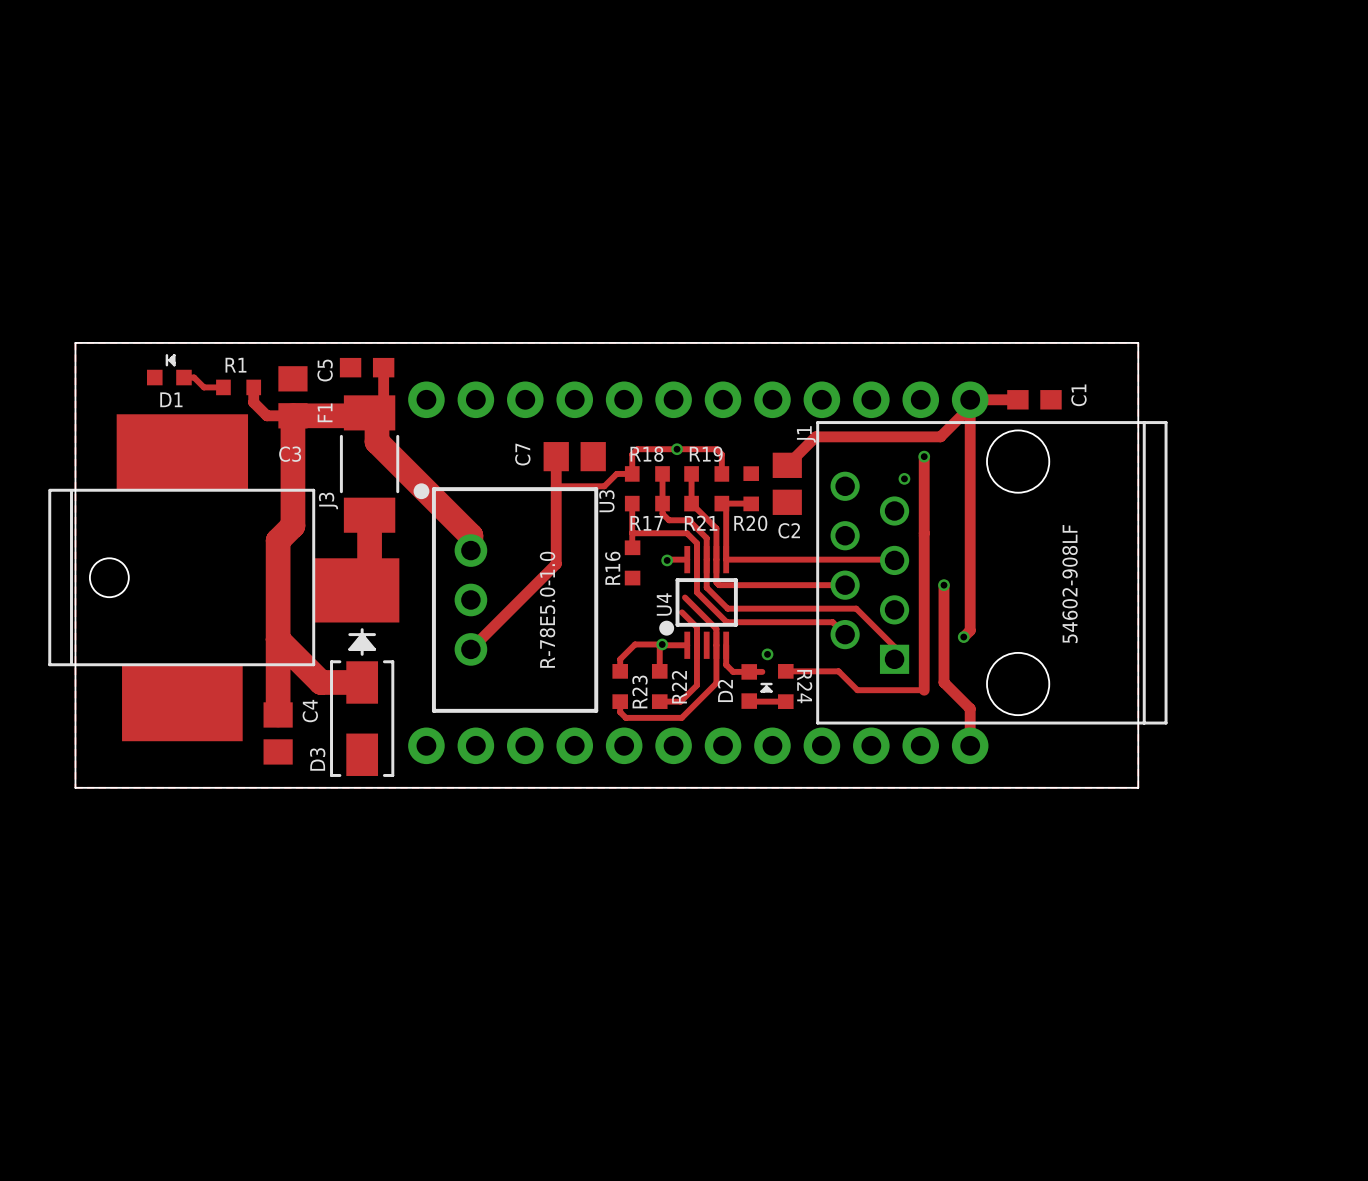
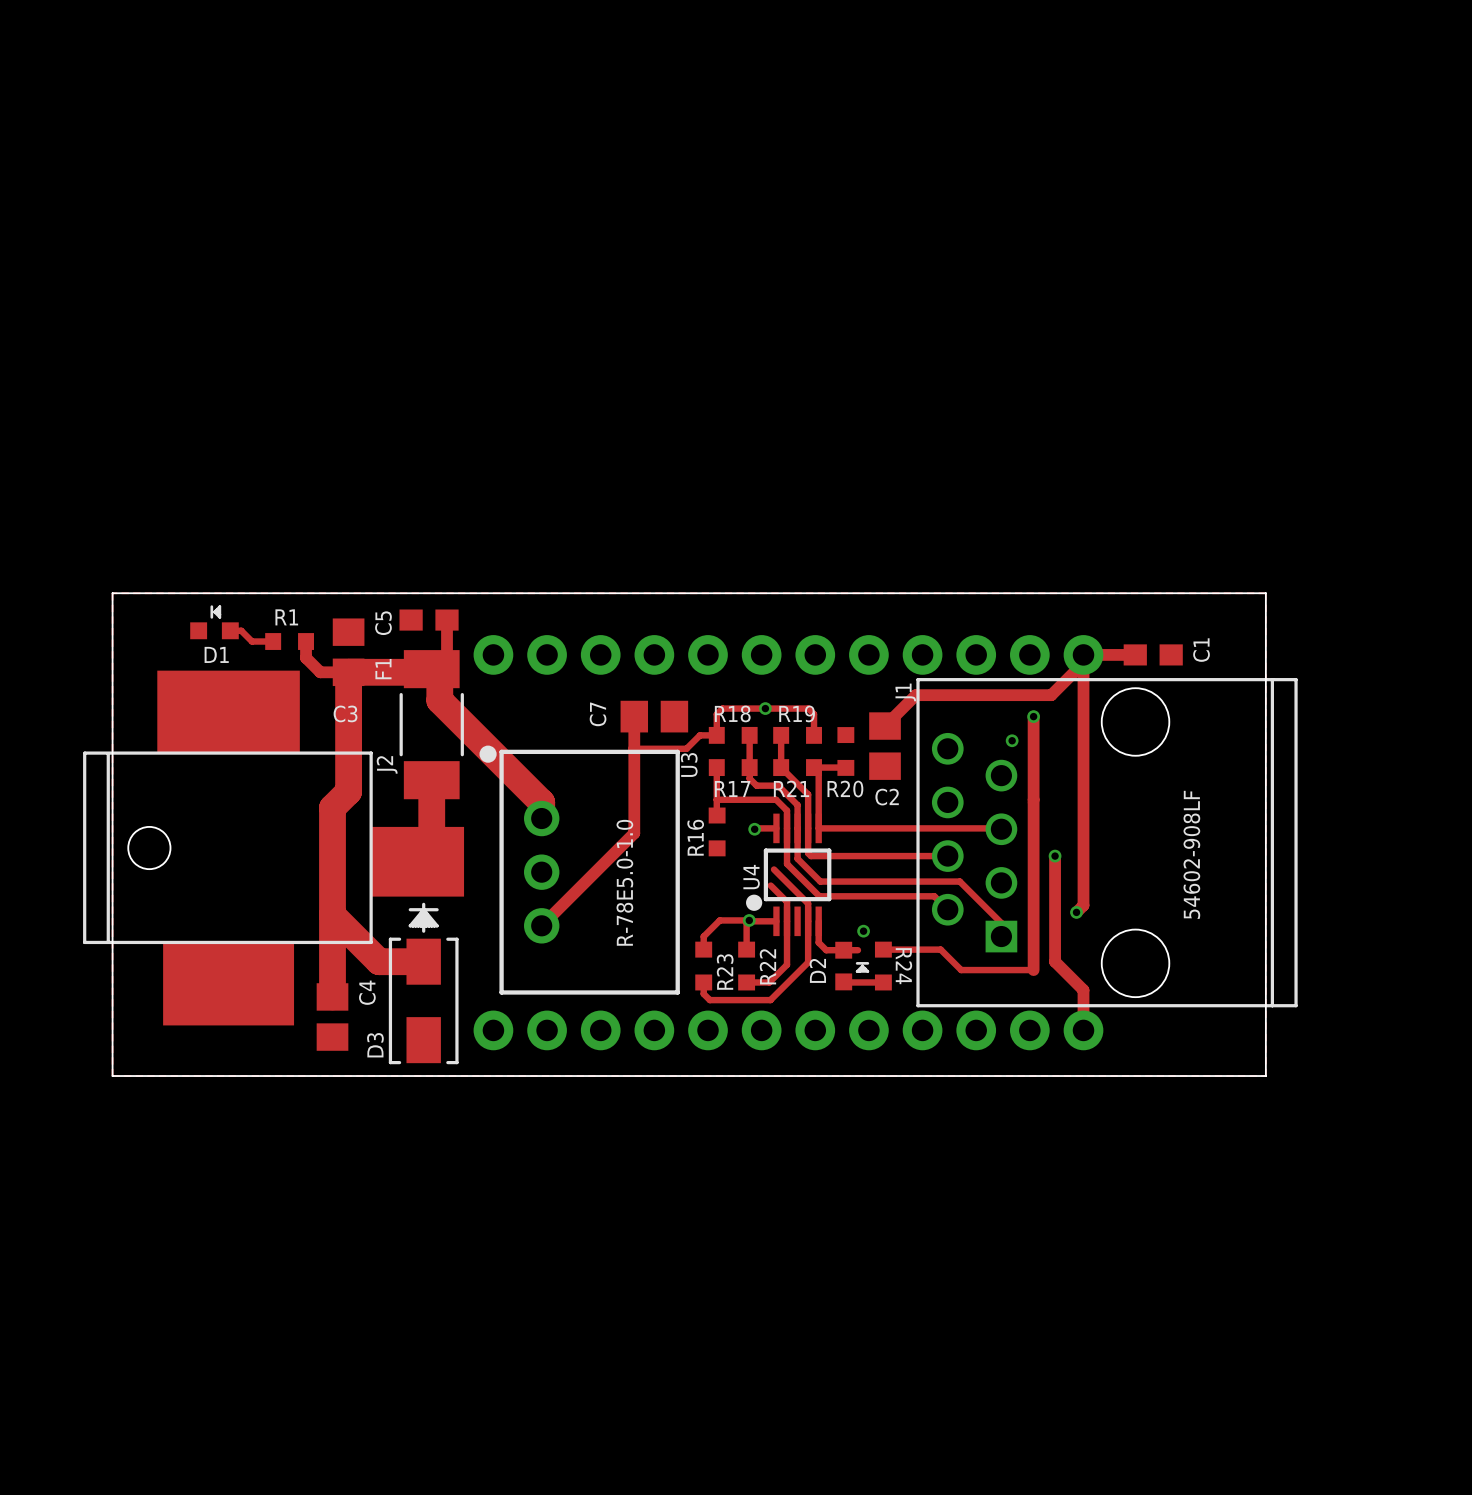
J3 name: J3 (328, 500) -> J2 (387, 764)

